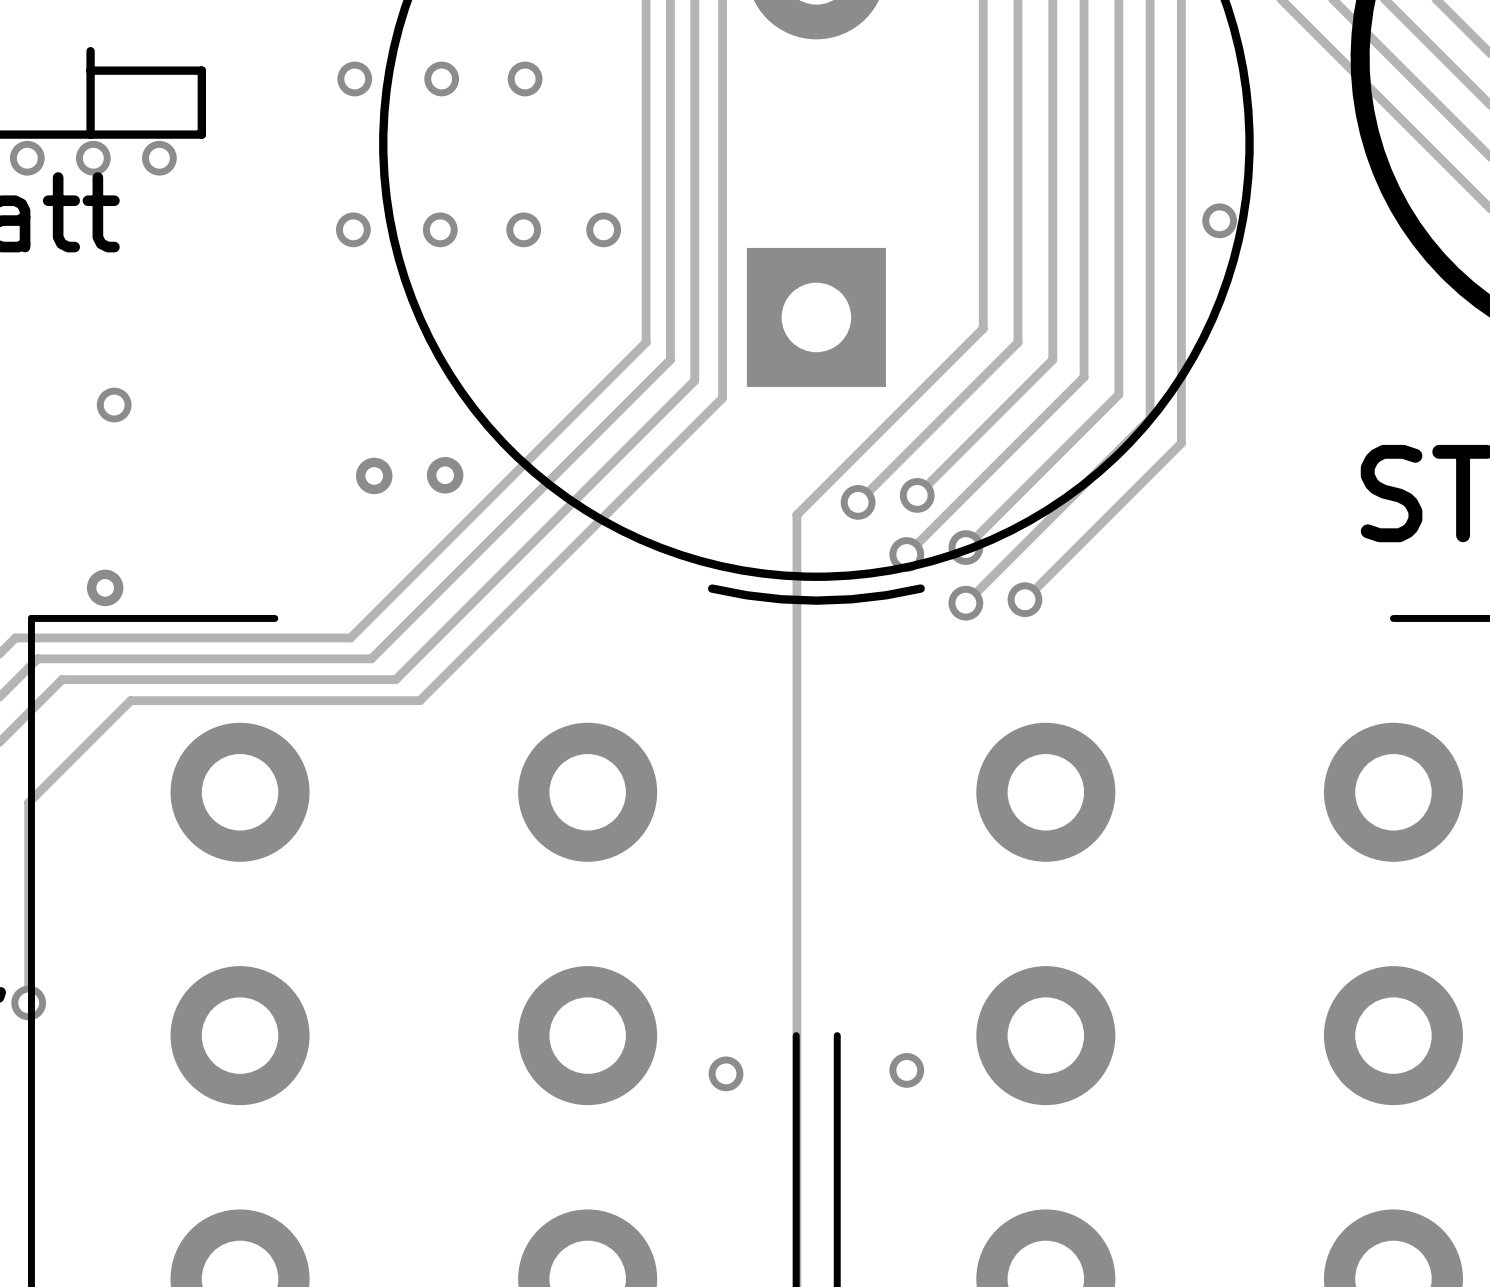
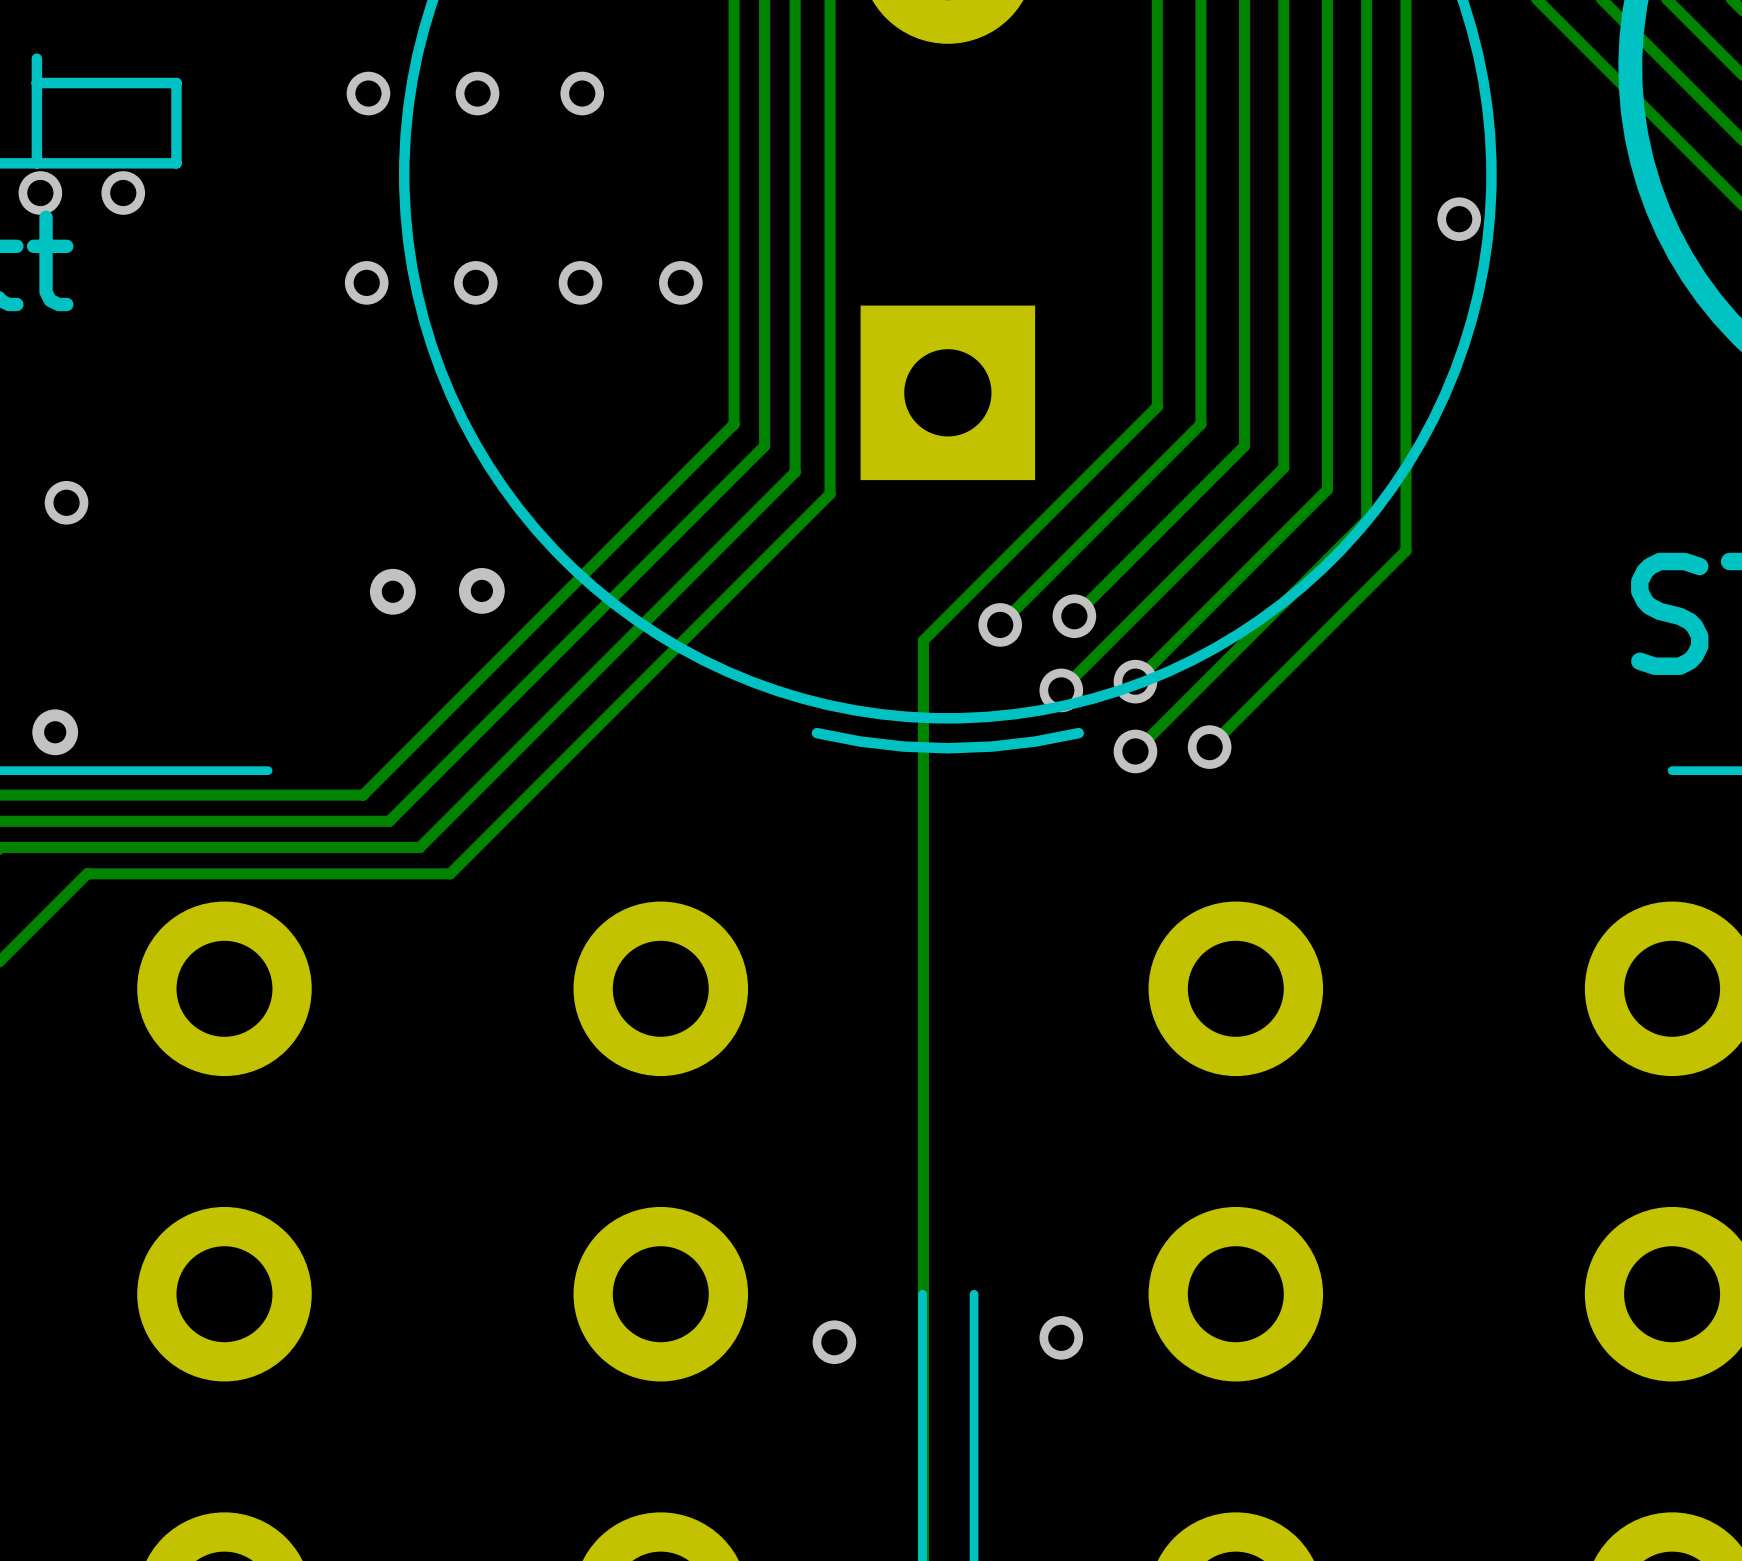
via position: (1219, 220) -> (1459, 219)

